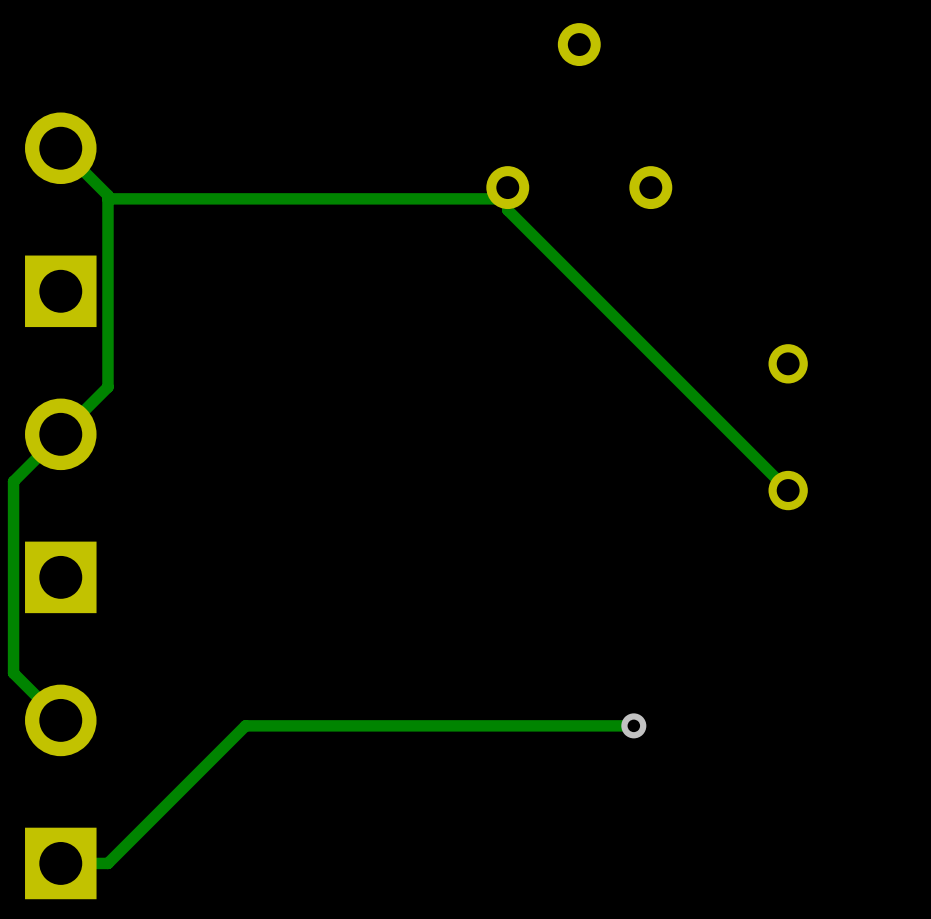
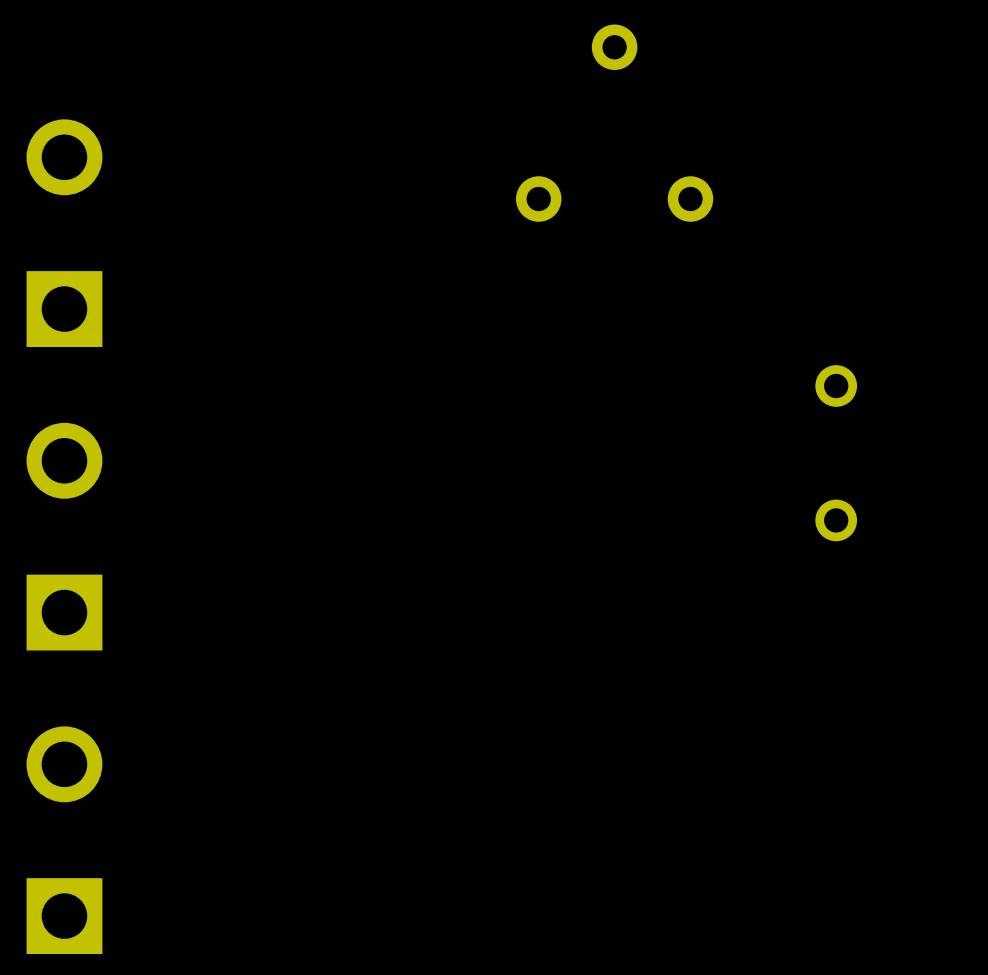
track: (60, 148) (107, 195) (107, 387) (13, 481) (13, 673) (60, 720) -> none
track: (507, 187) (507, 210) (788, 490) -> none
track: (507, 198) (107, 198) -> none
track: (633, 725) (245, 725) (107, 863) (60, 863) -> none
via: (633, 725) -> none

